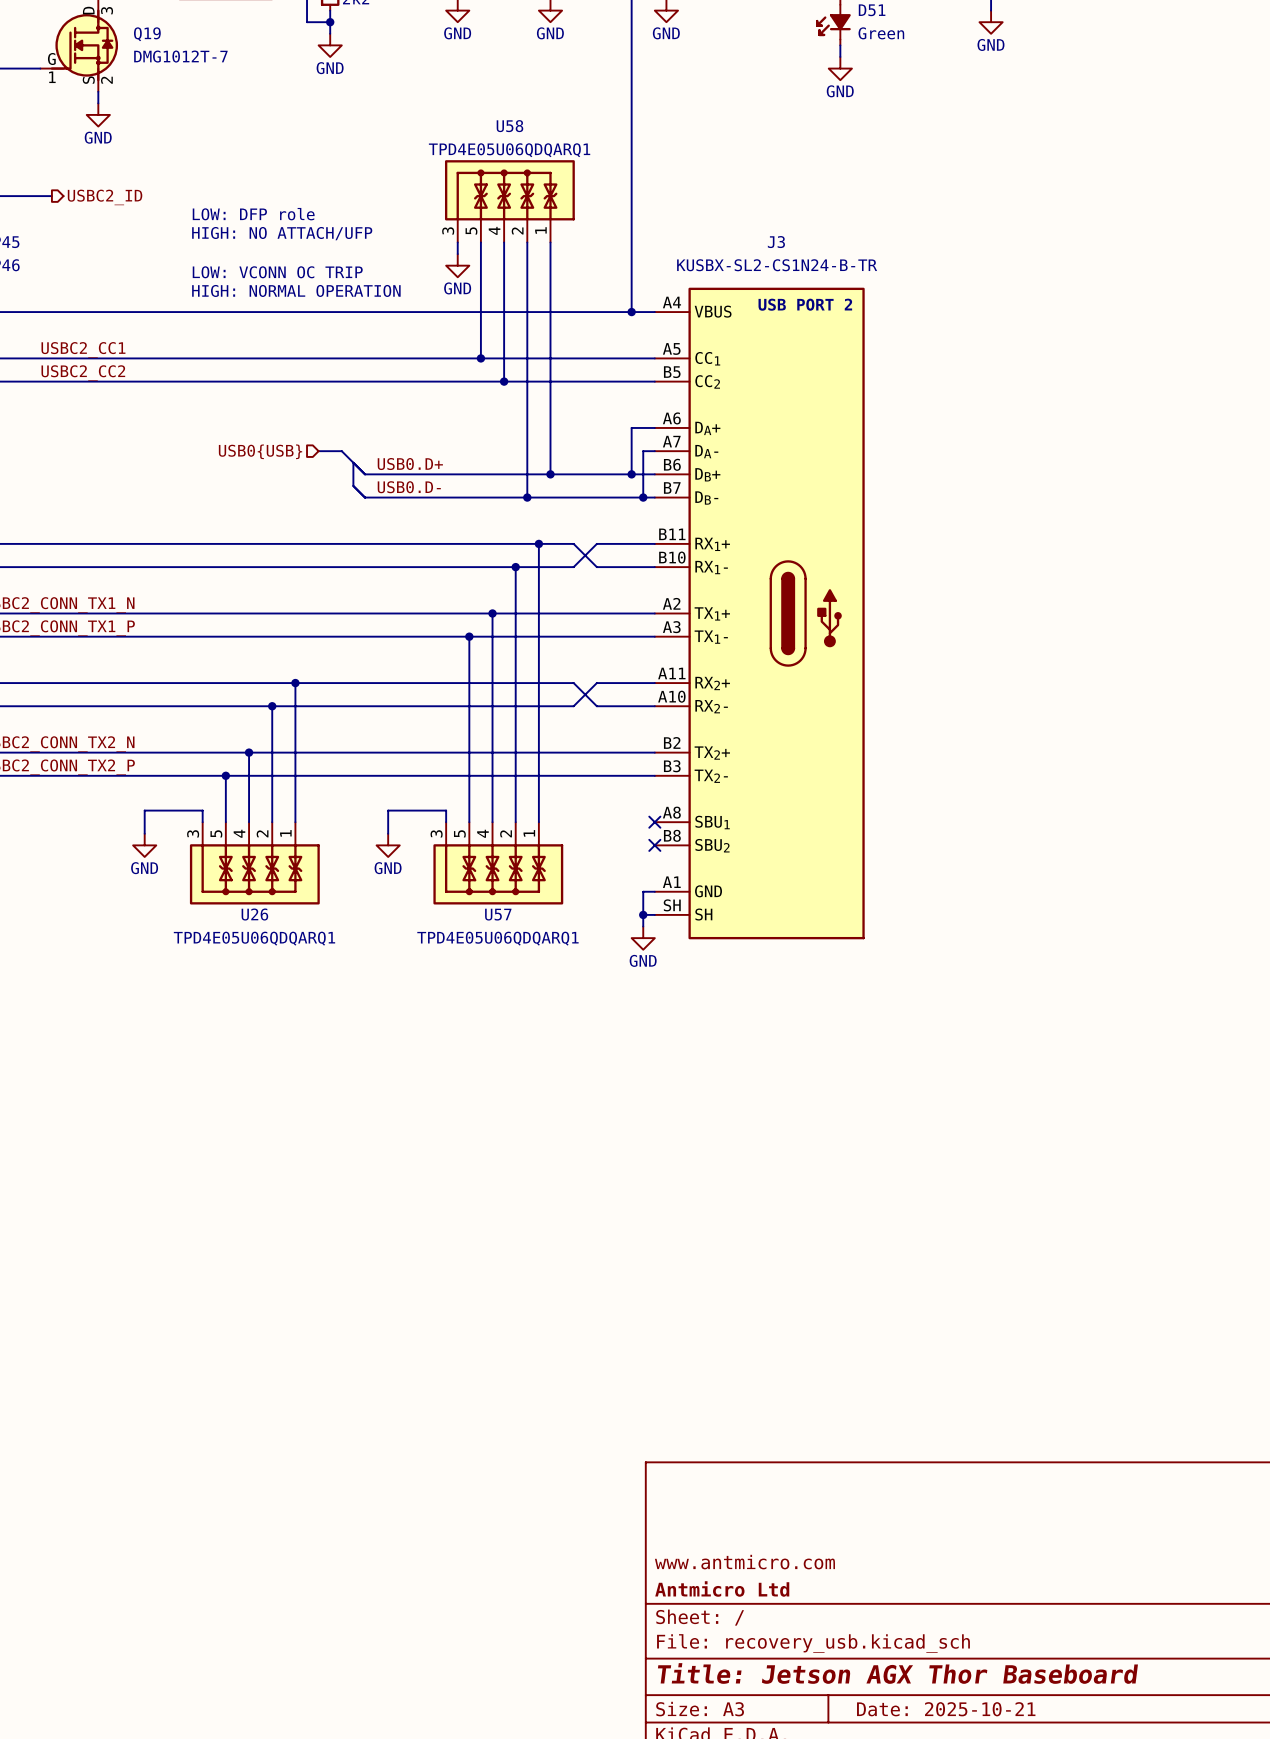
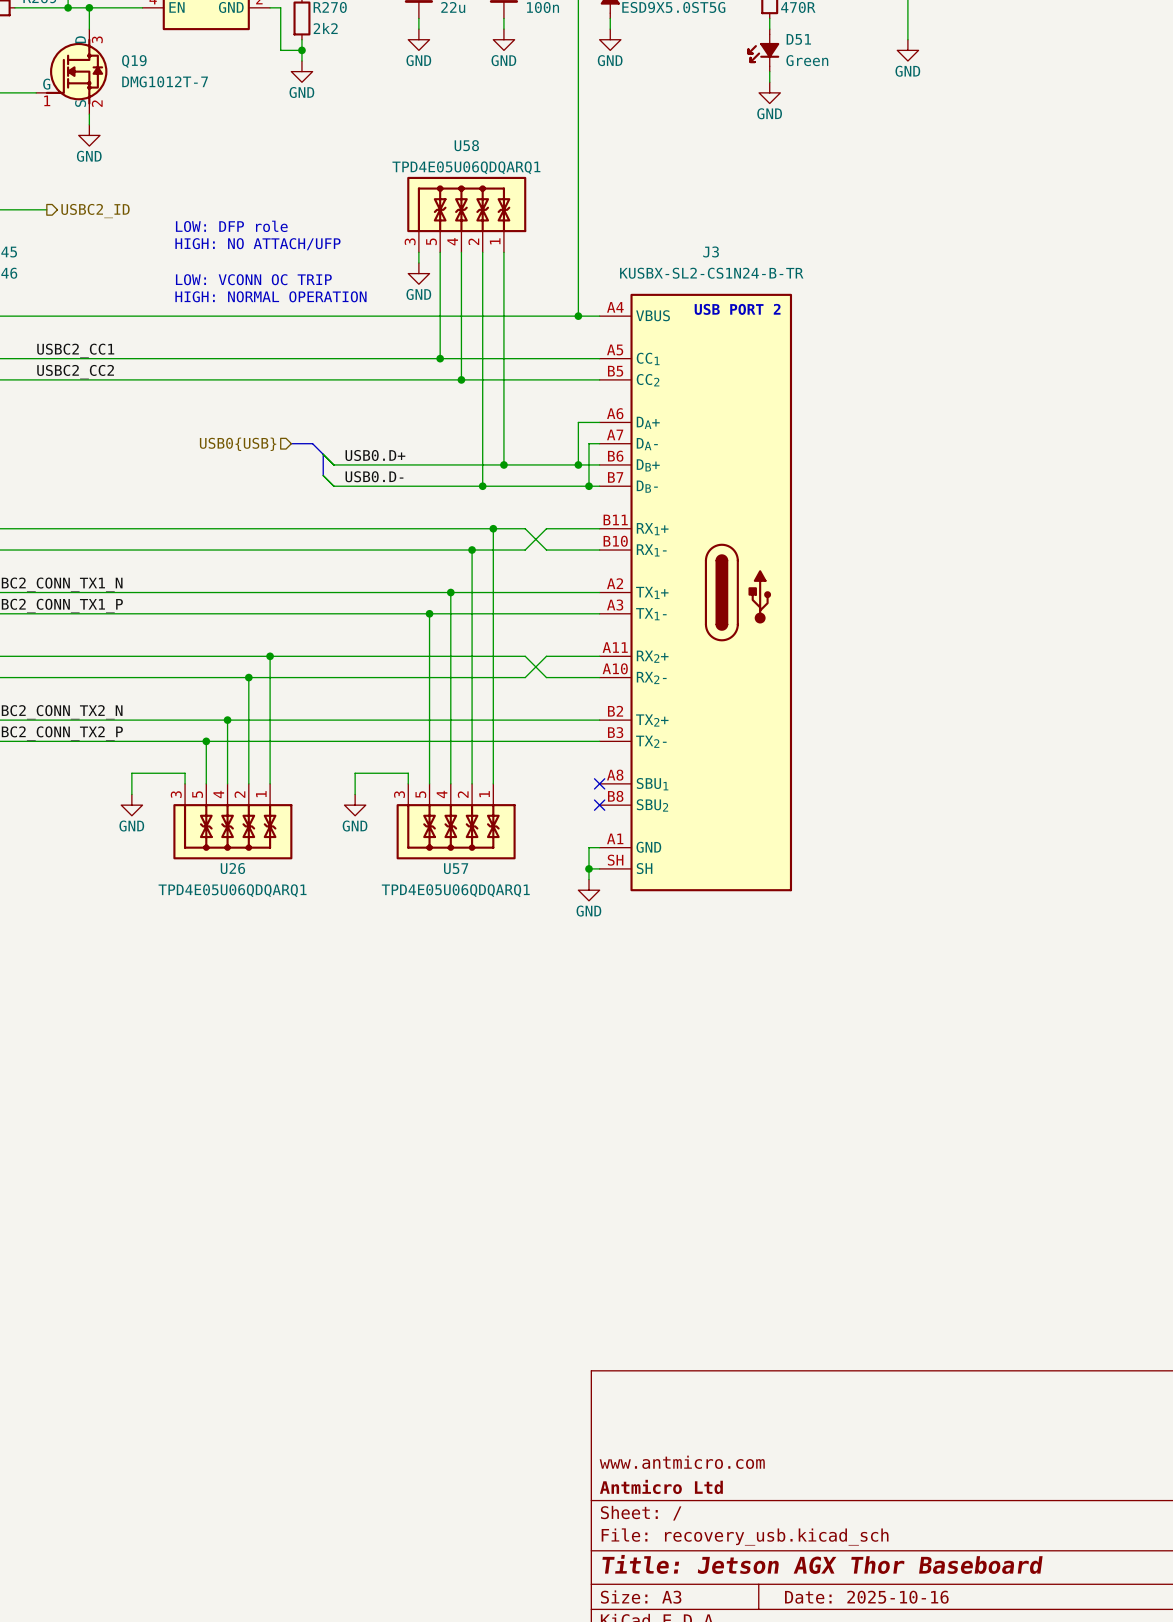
title block: Date: 2025-10-21 (946, 1709) -> Date: 2025-10-16 (866, 1597)

